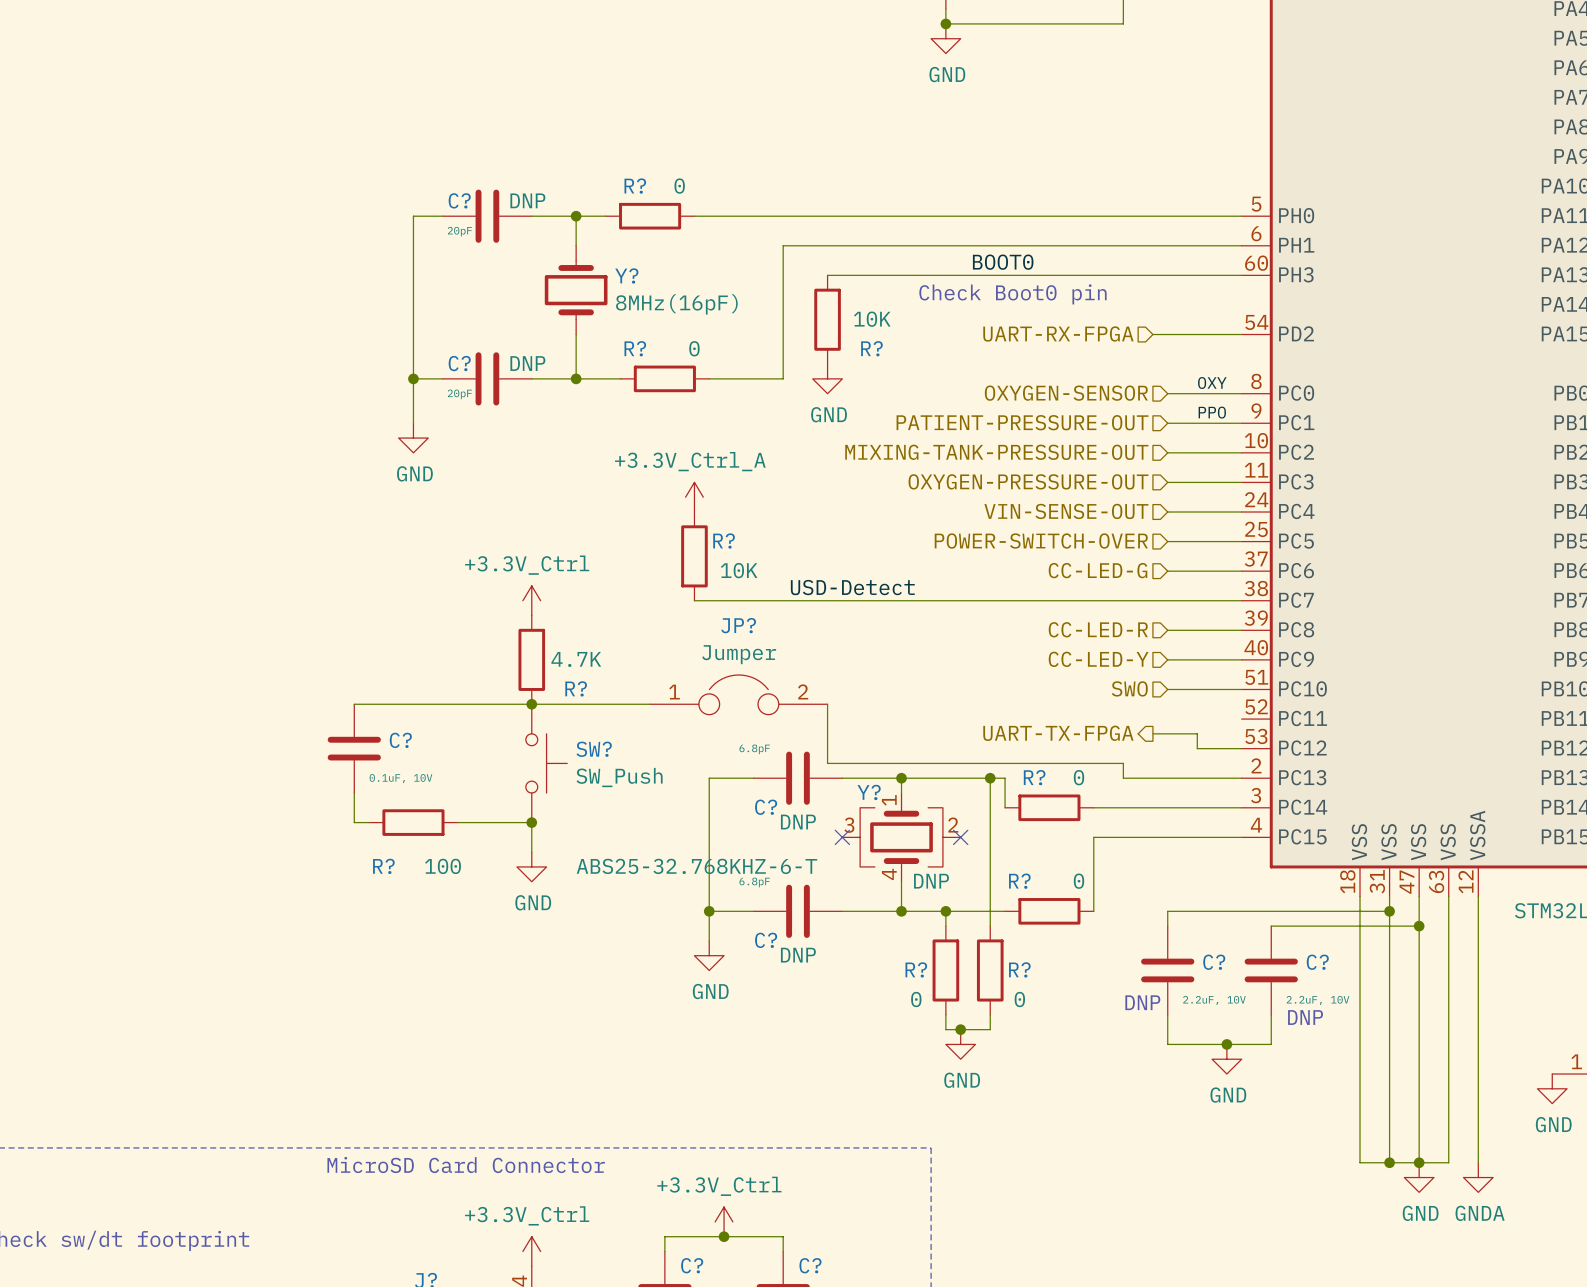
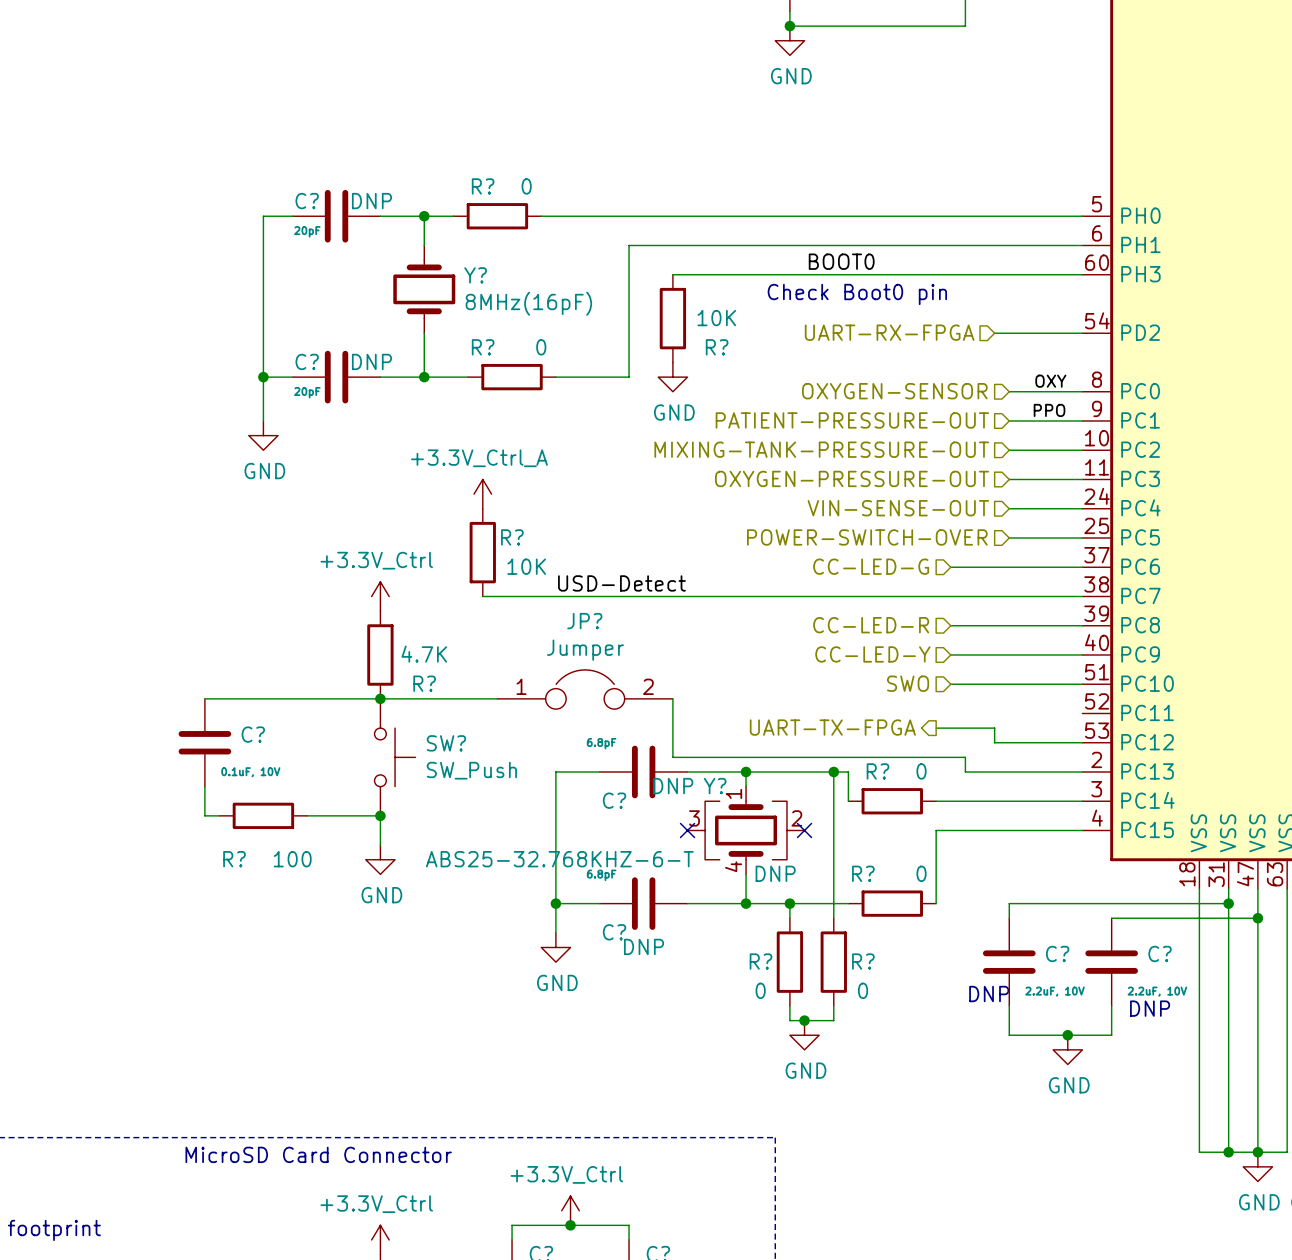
power symbol position: +3.3V_Ctrl_A (694, 497) -> +3.3V_Ctrl_A (482, 494)
R? position: (694, 556) -> (482, 552)
hierarchical label position: CC-LED-G (1098, 570) -> CC-LED-G (871, 566)
wire: none -> (950, 567) (1009, 567)
label position: USD-Detect (852, 587) -> USD-Detect (621, 583)
wire: none -> (482, 596) (541, 596)
hierarchical label position: CC-LED-R (1098, 629) -> CC-LED-R (871, 625)
wire: none -> (950, 625) (1009, 625)
hierarchical label position: CC-LED-Y (1098, 659) -> CC-LED-Y (872, 654)
wire: none -> (950, 654) (1009, 654)
hierarchical label position: SWO (1129, 688) -> SWO (908, 683)
wire: none -> (950, 684) (1009, 684)
hierarchical label position: UART-TX-FPGA (1058, 733) -> UART-TX-FPGA (832, 727)
wire: (1152, 733) (1197, 733) (1197, 748) -> (936, 728) (994, 728) (994, 742) (1038, 742)
C? text position: DNP (798, 822) -> DNP (673, 786)

